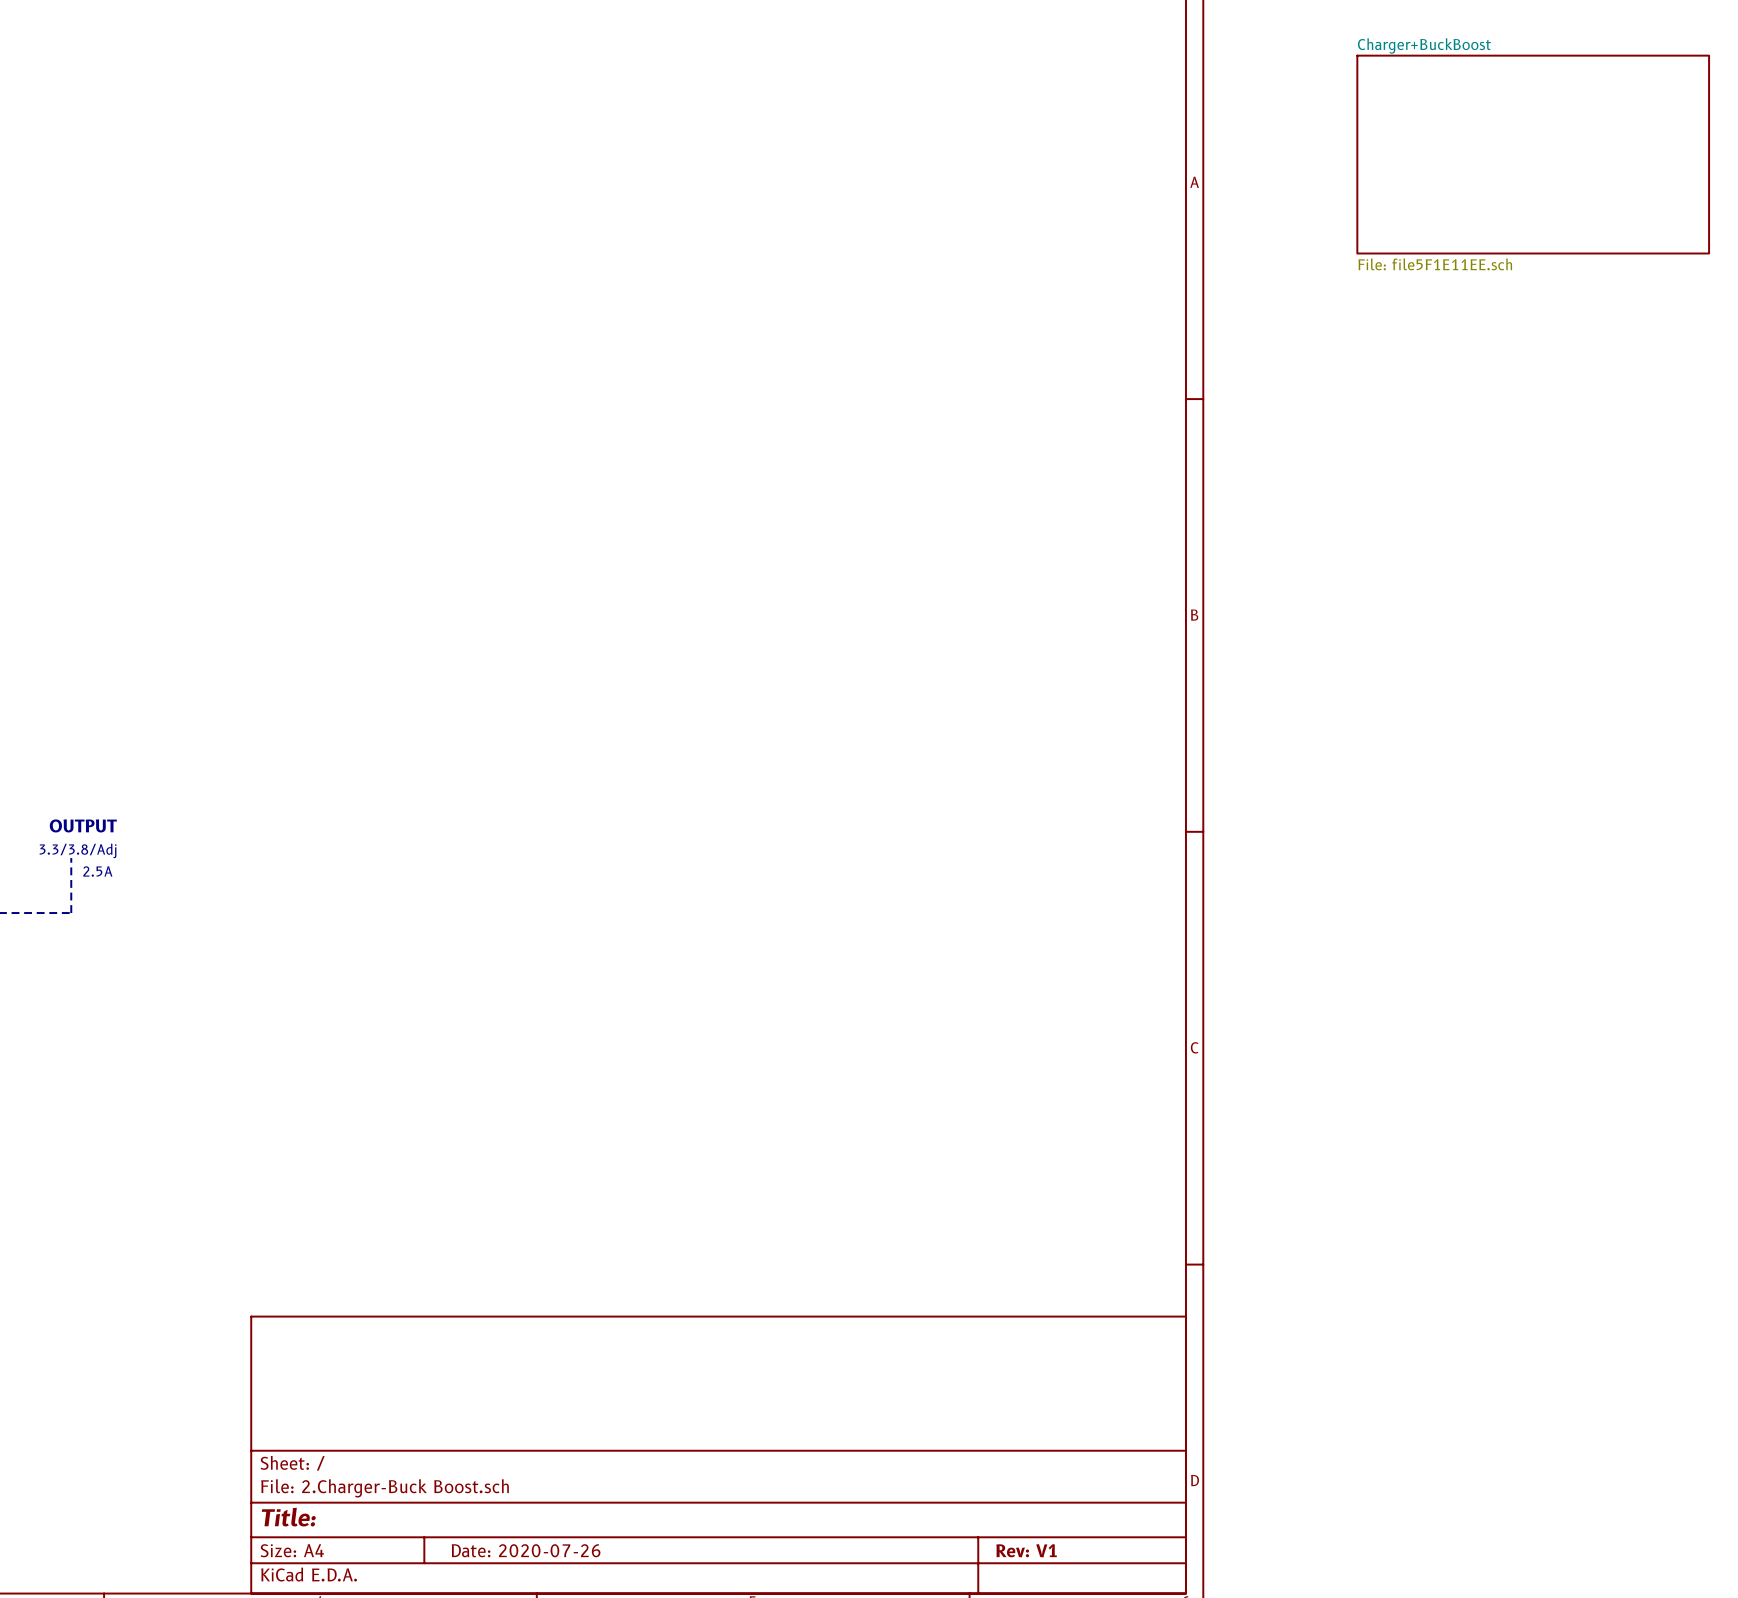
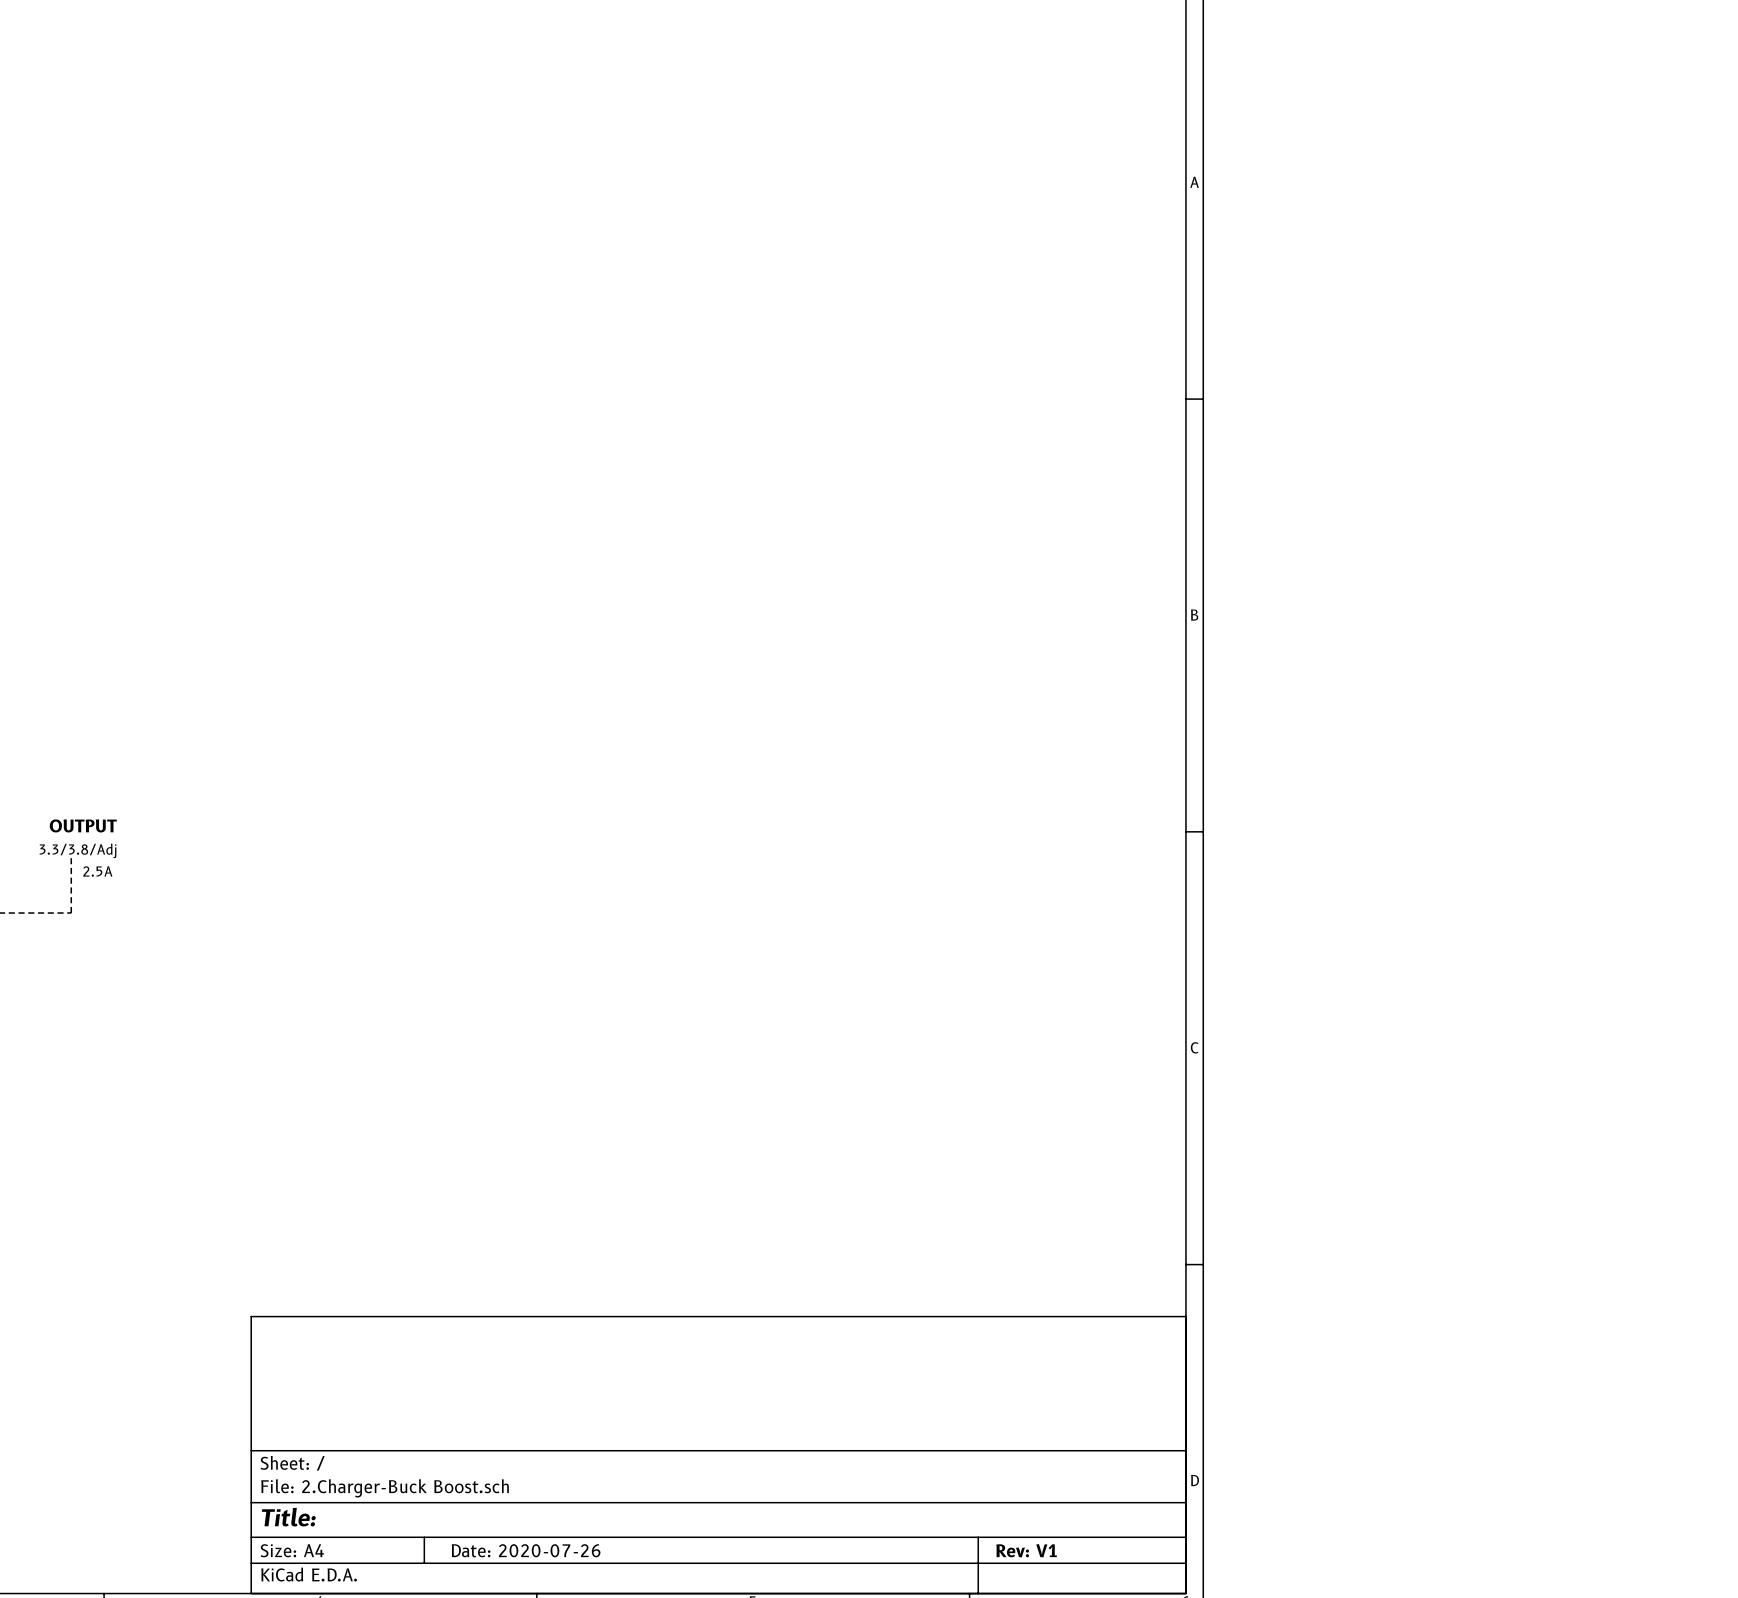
sheet Charger+BuckBoost: File: file5F1E11EE.sch (1533, 154) -> none

